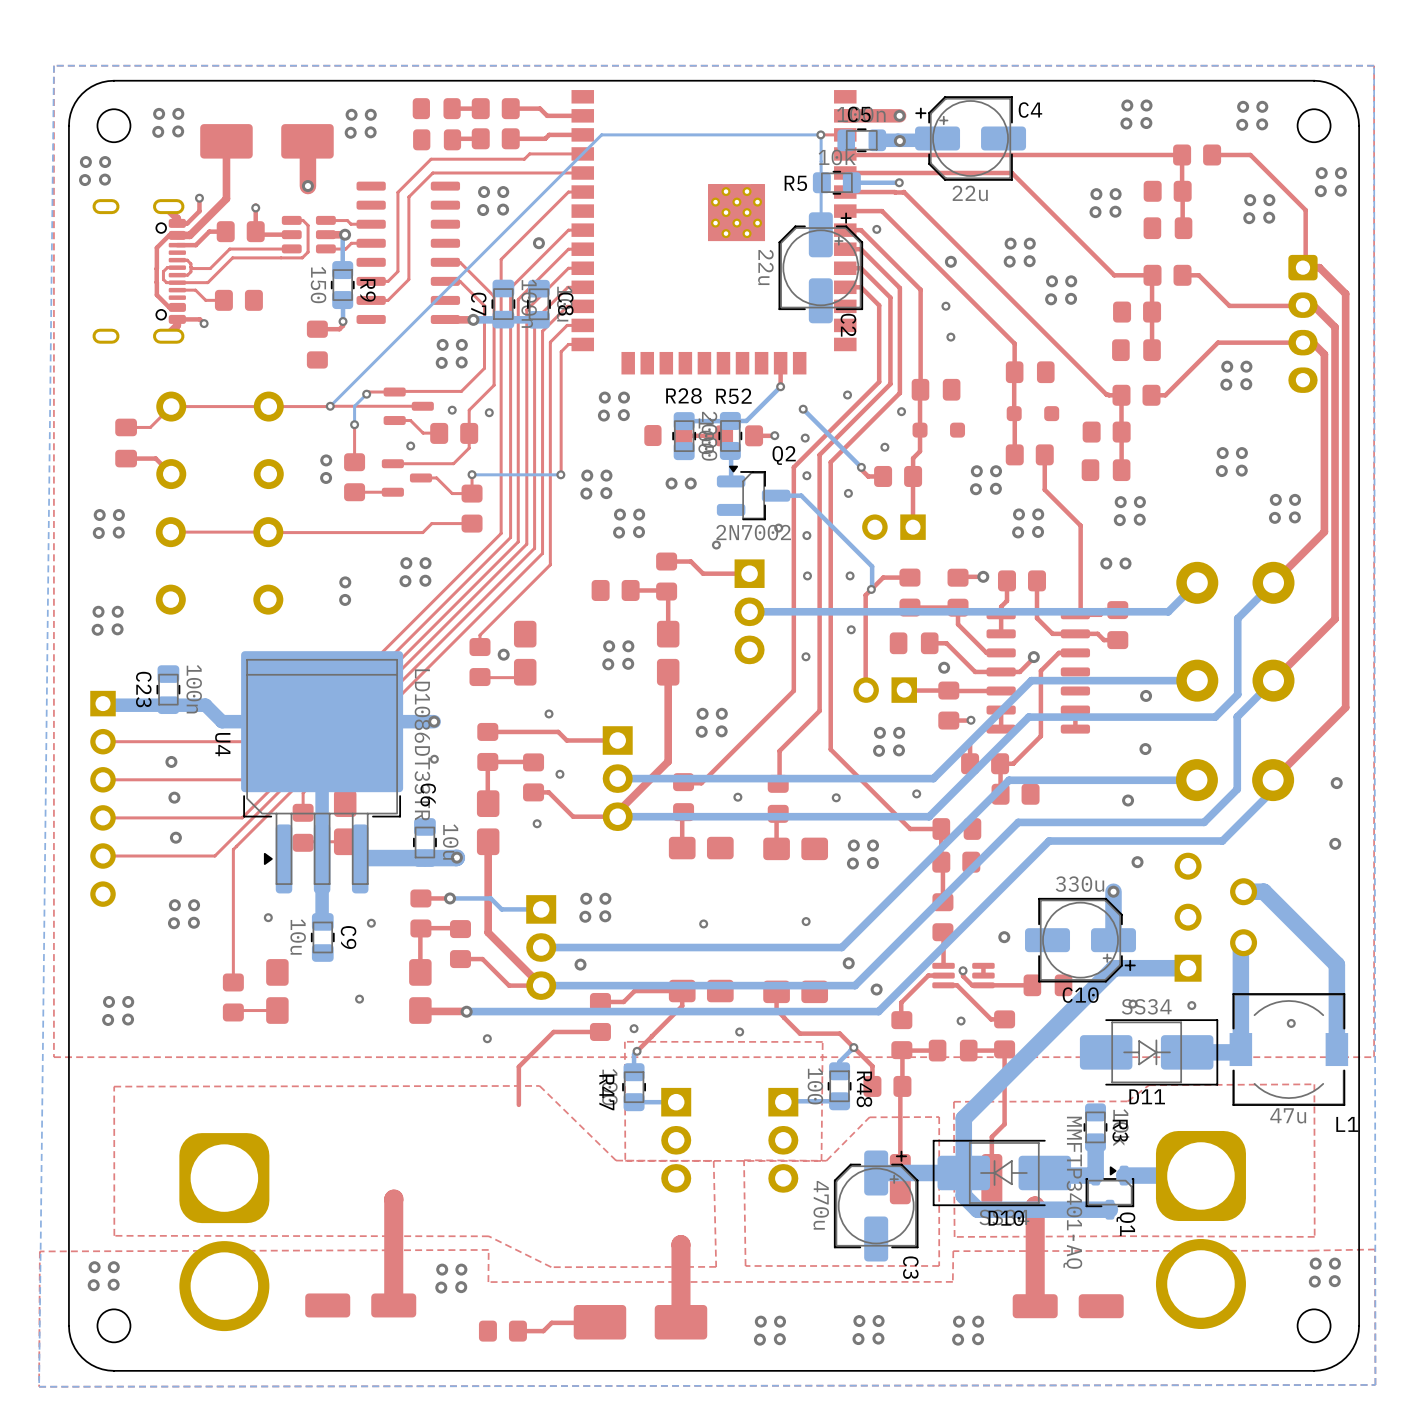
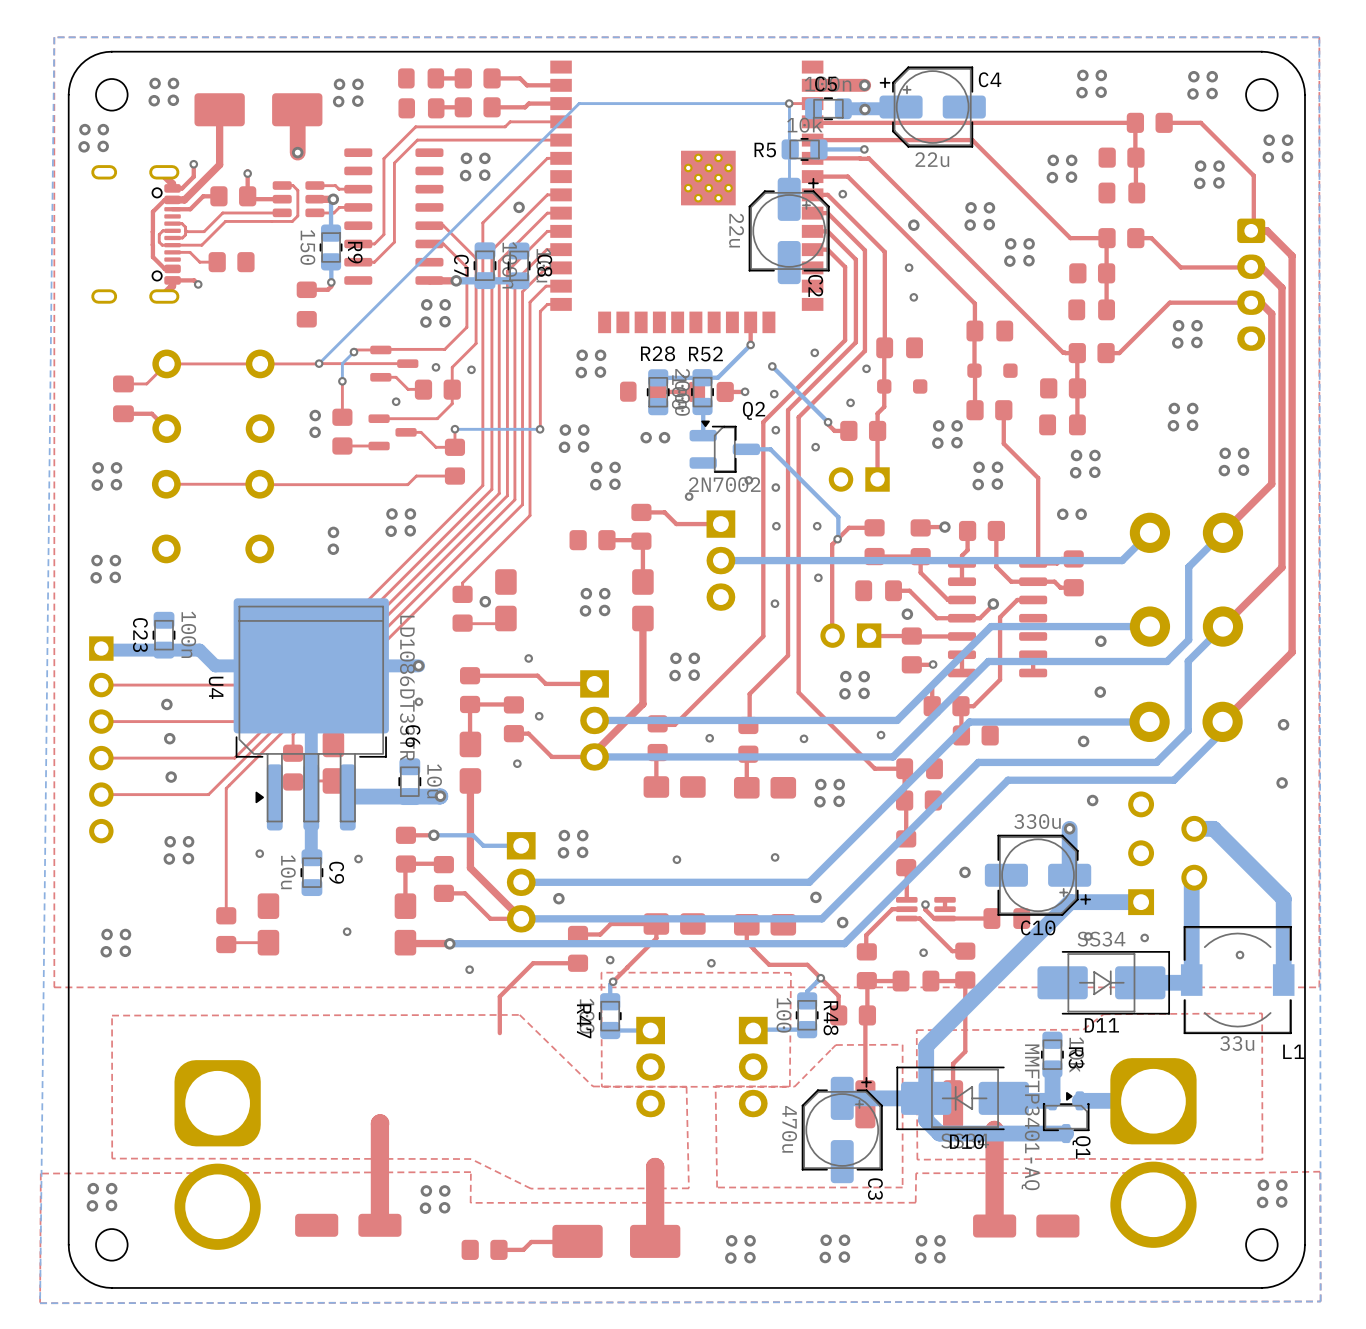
L1 value: 47u (1288, 1115) -> 33u (1237, 1043)

